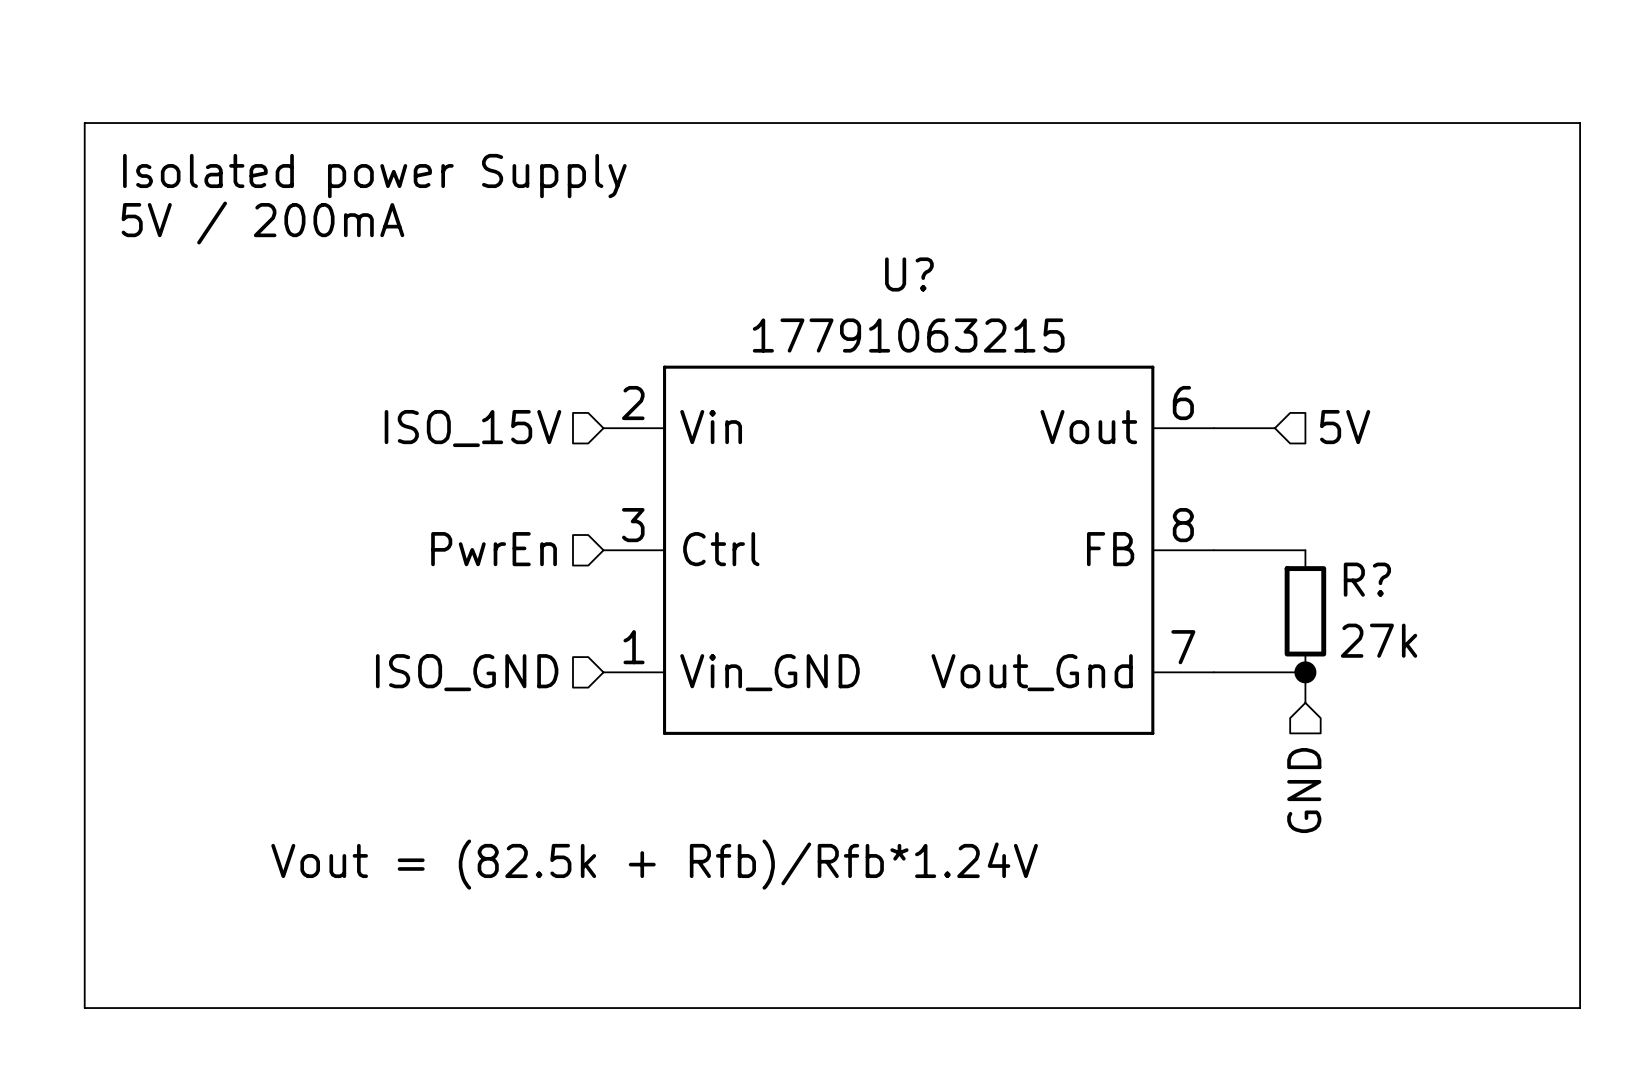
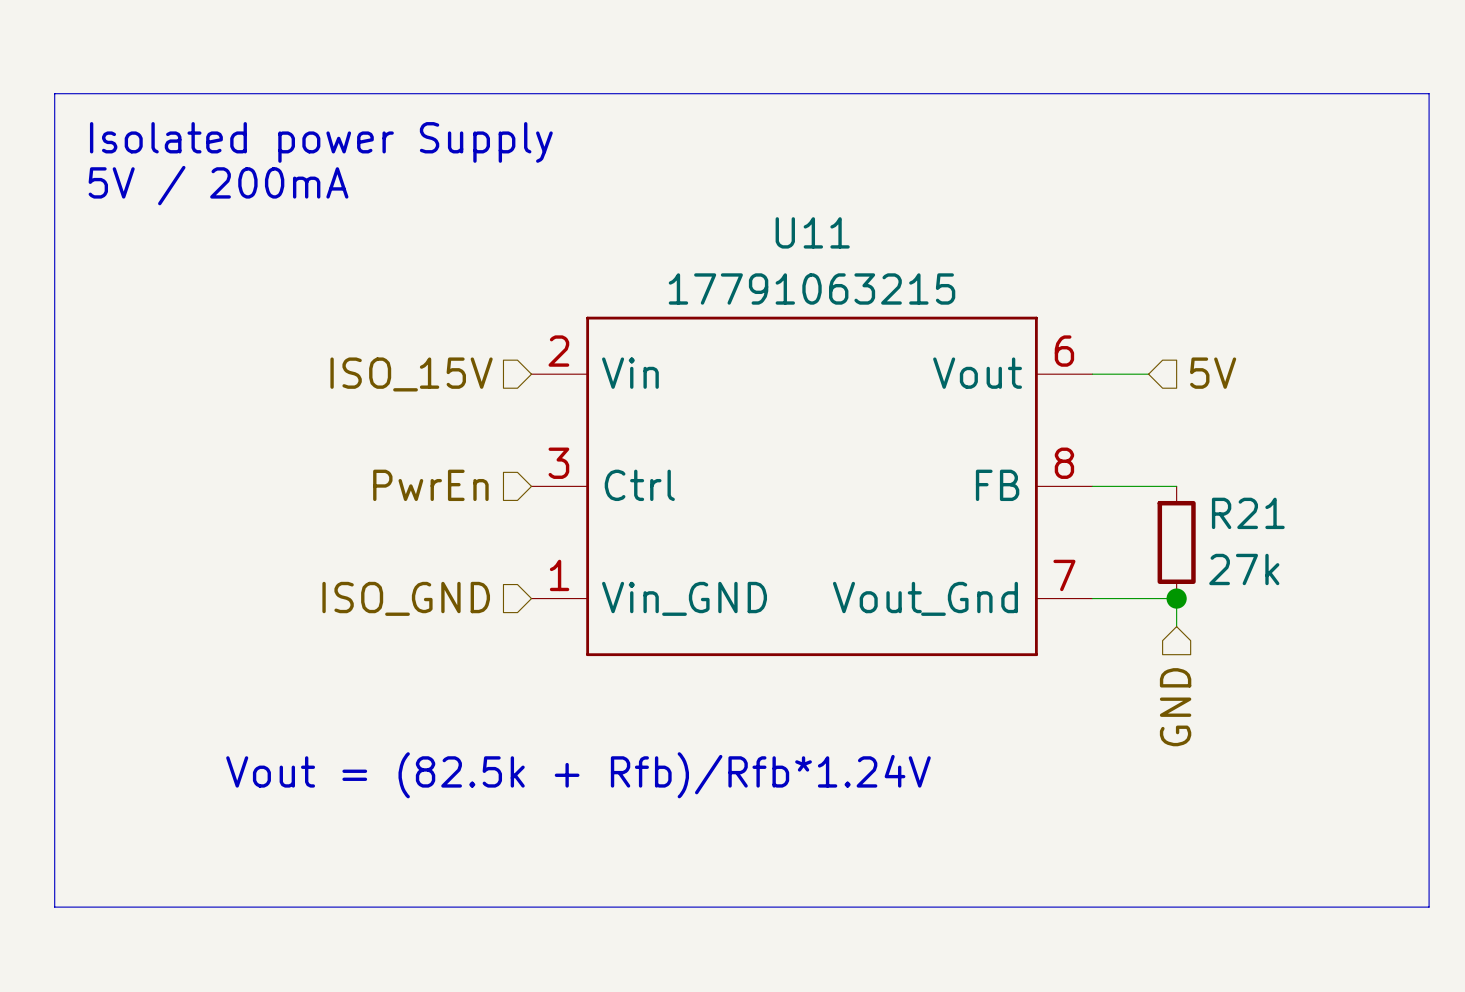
U? name: U? (909, 274) -> U11 (812, 232)
R? name: R? (1367, 579) -> R21 (1248, 513)

